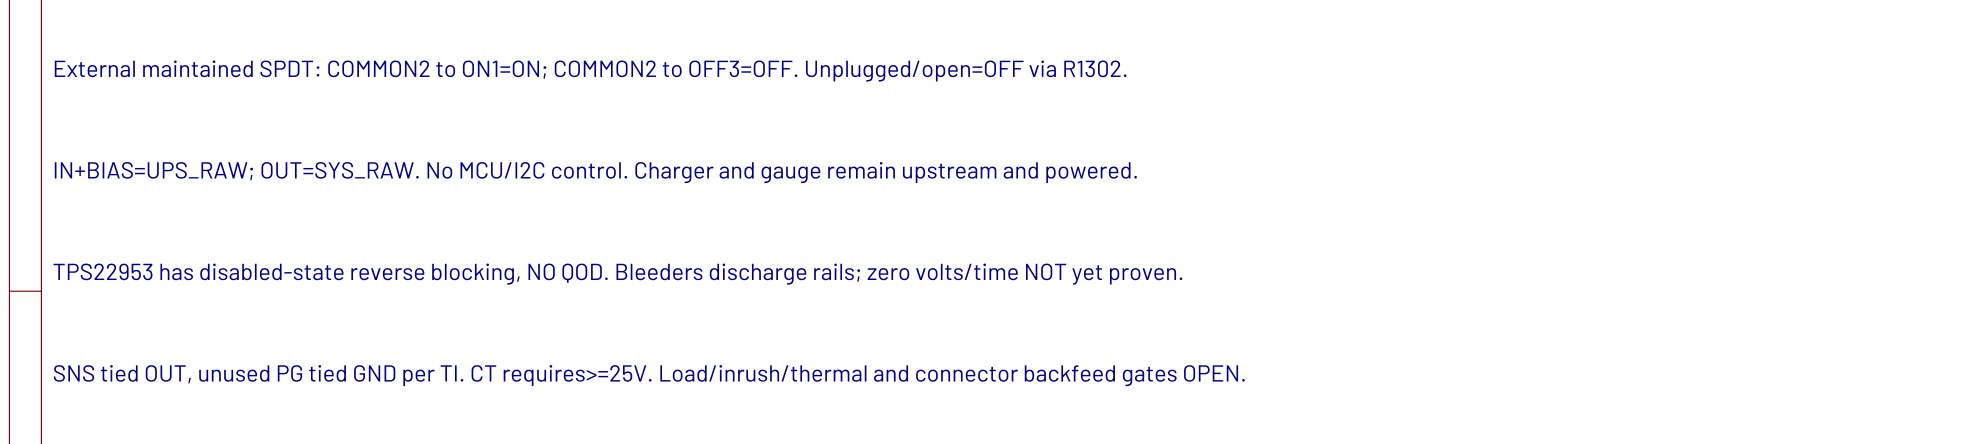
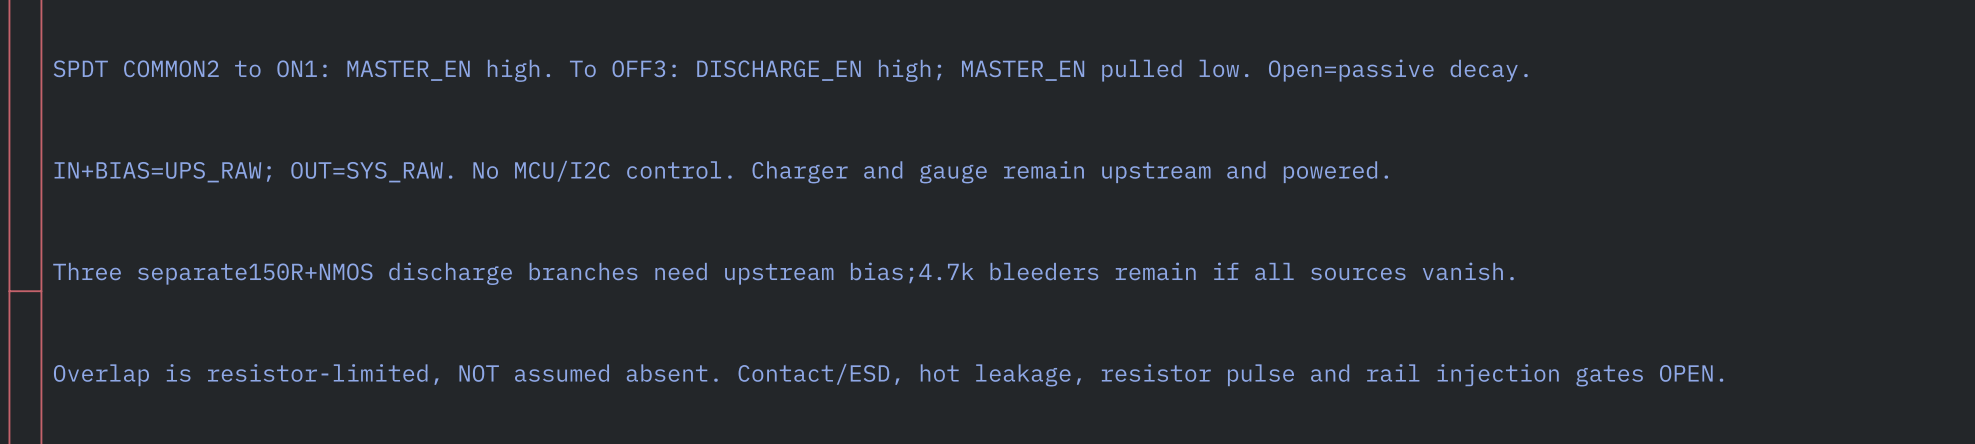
text: External maintained SPDT: COMMON2 to ON1=ON; COMMON2 to OFF3=OFF. Unplugged/open=OFF via R1302. (590, 71) -> SPDT COMMON2 to ON1: MASTER_EN high. To OFF3: DISCHARGE_EN high; MASTER_EN pulled low. Open=passive decay. (790, 70)
text: TPS22953 has disabled-state reverse blocking, NO QOD. Bleeders discharge rails; zero volts/time NOT yet proven. (617, 274) -> Three separate150R+NMOS discharge branches need upstream bias;4.7k bleeders remain if all sources vanish. (783, 273)
text: SNS tied OUT, unused PG tied GND per TI. CT requires>=25V. Load/inrush/thermal and connector backfeed gates OPEN. (649, 375) -> Overlap is resistor-limited, NOT assumed absent. Contact/ESD, hot leakage, resistor pulse and rail injection gates OPEN. (888, 375)

